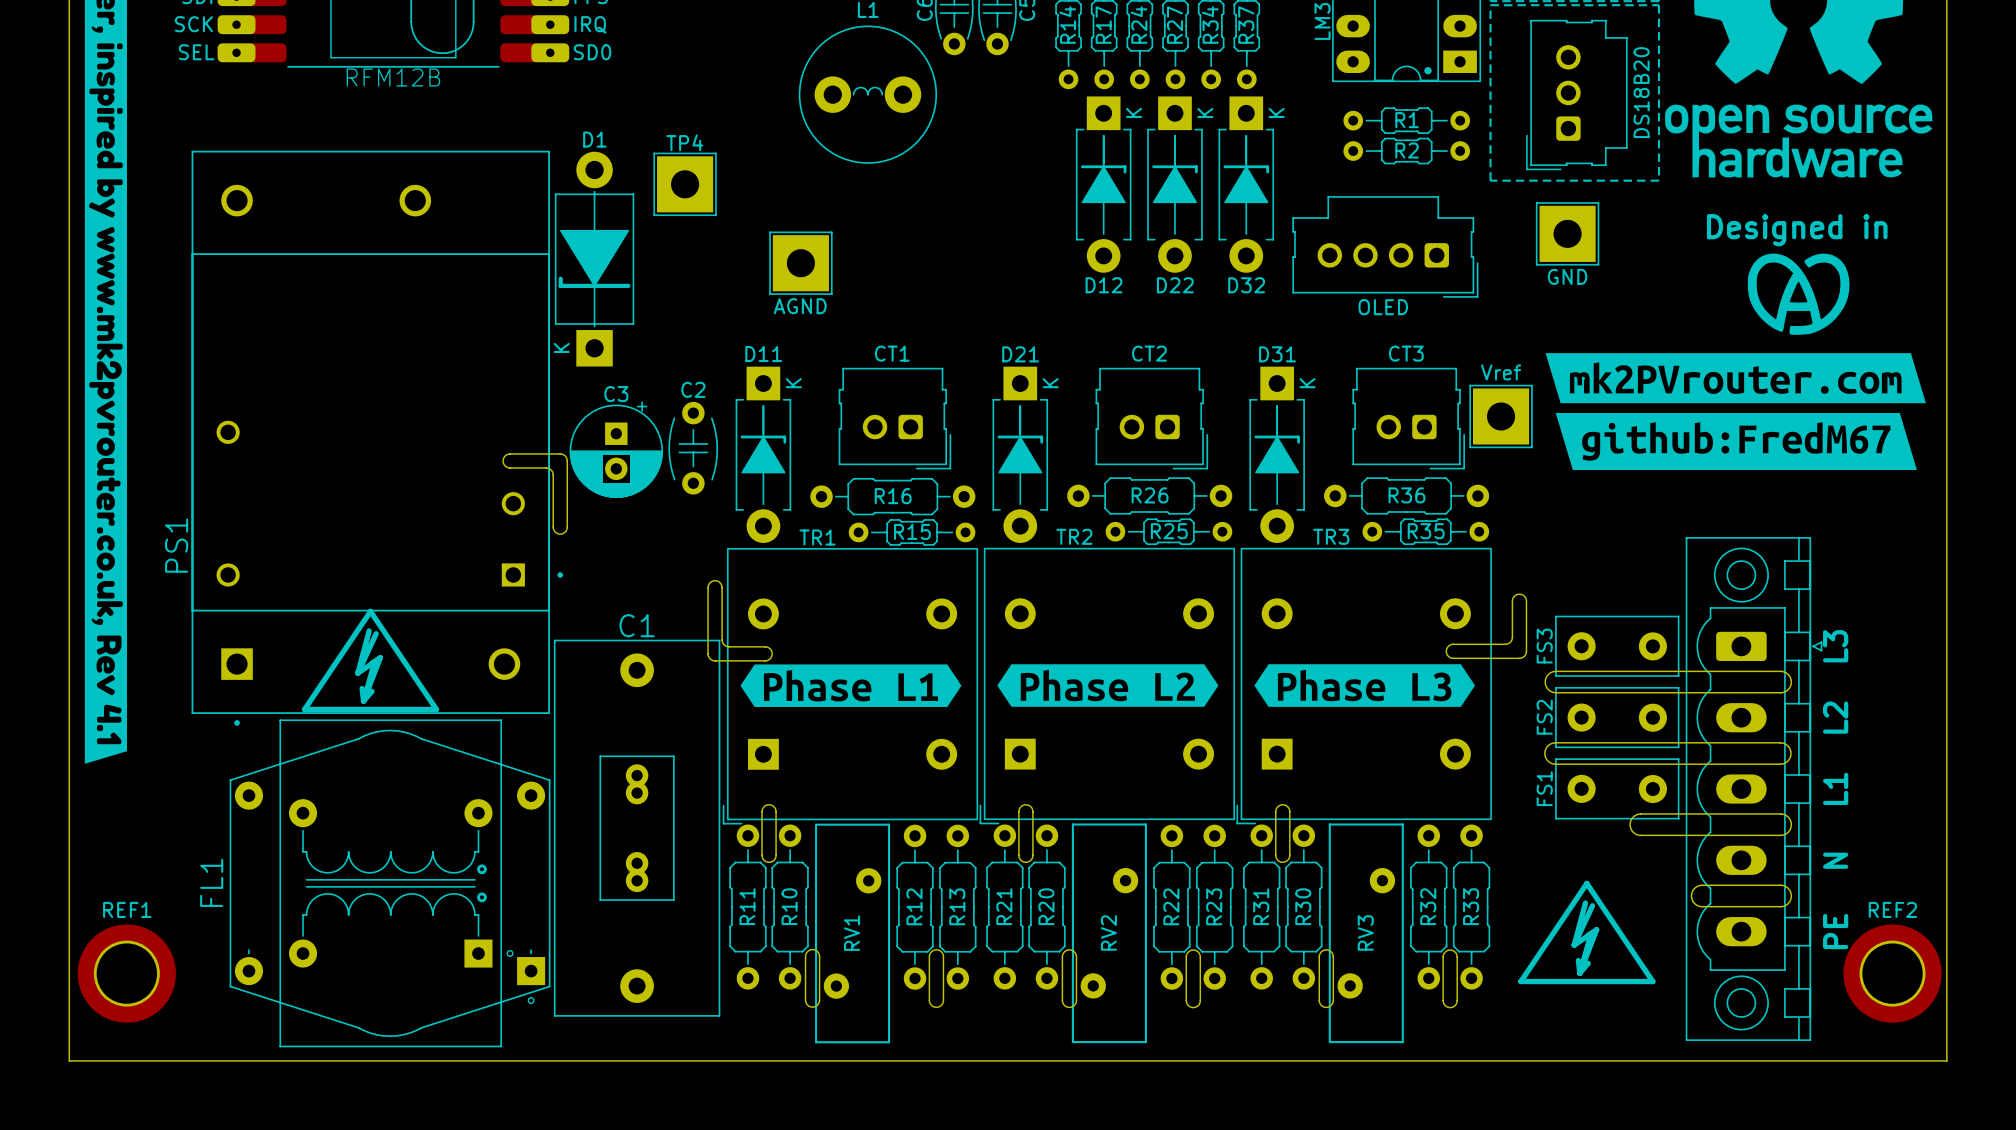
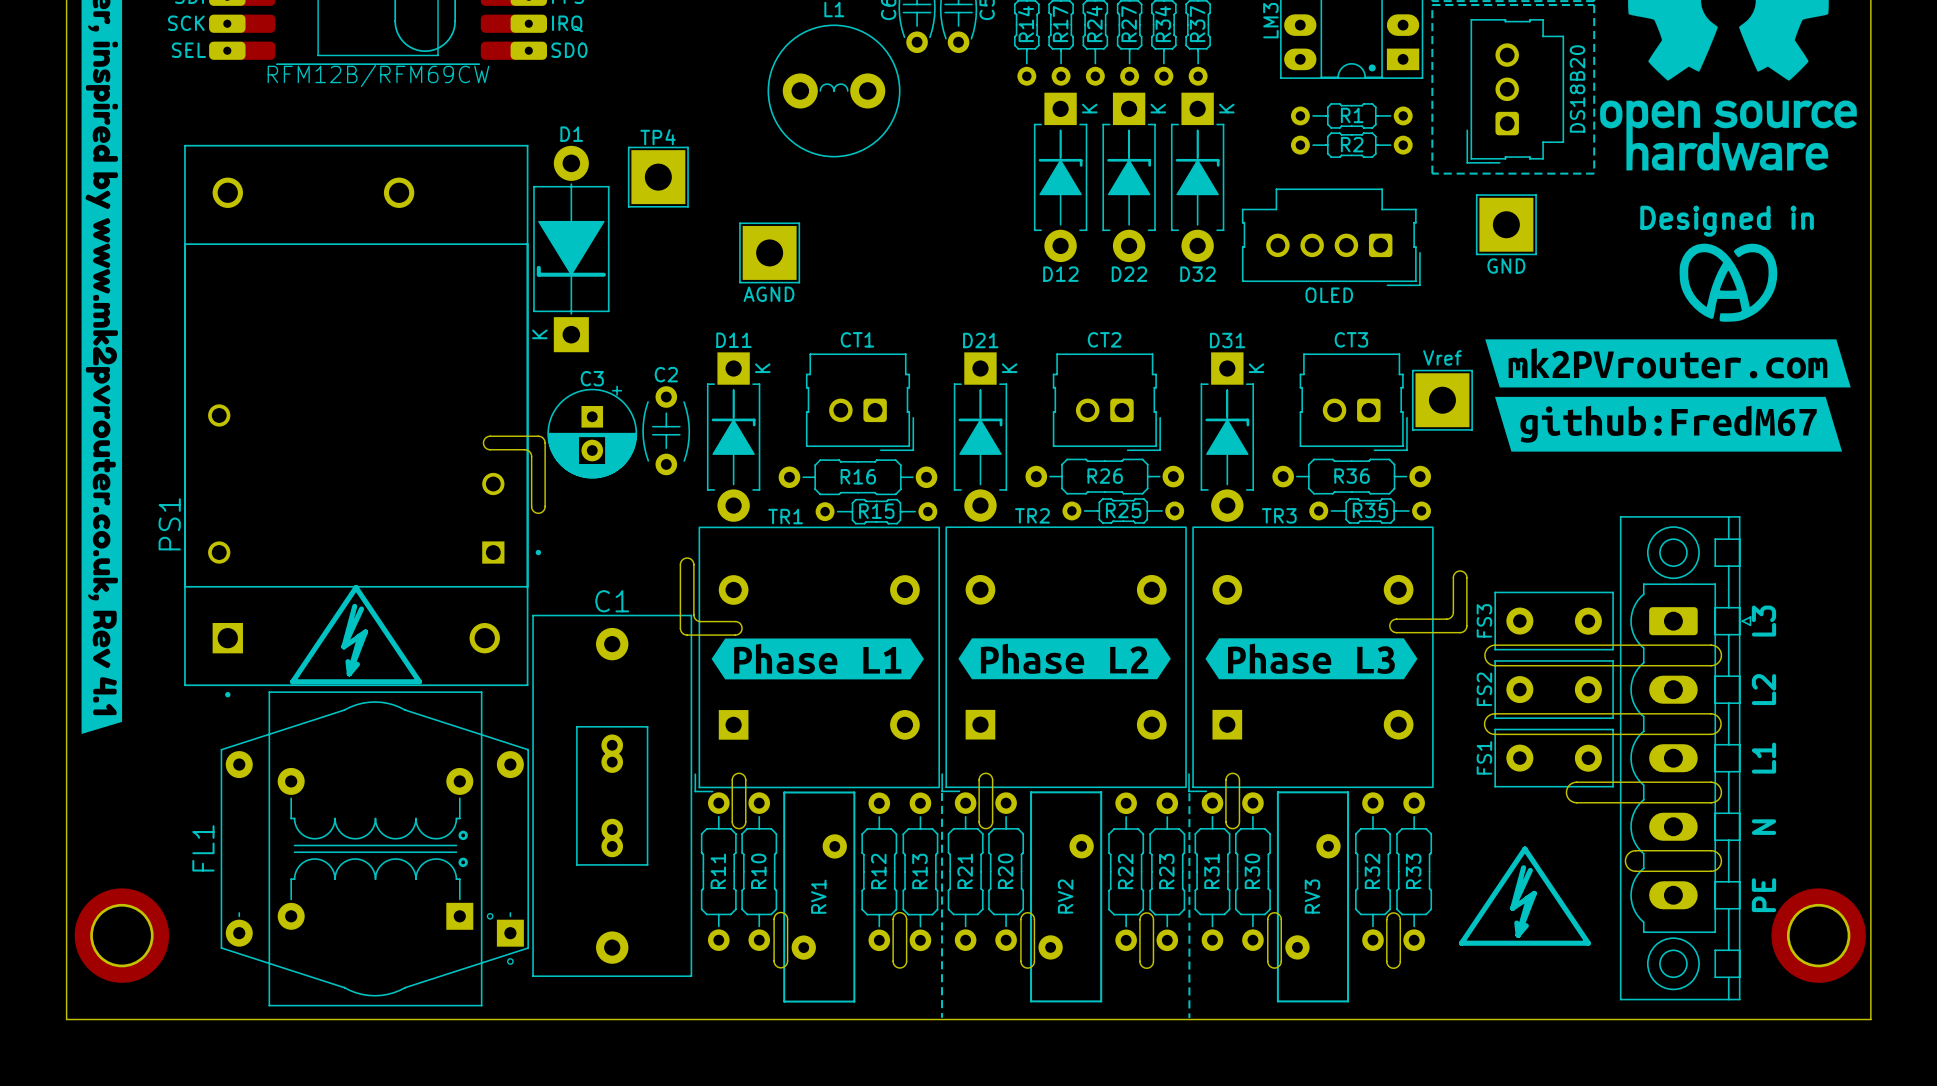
part value: RFM12B (393, 77) -> RFM12B/RFM69CW (378, 75)
line: none -> (942, 792) (942, 1017)
line: none -> (1189, 793) (1189, 1018)
REF1 name: REF1 (127, 909) -> none
REF2 name: REF2 (1892, 909) -> none

